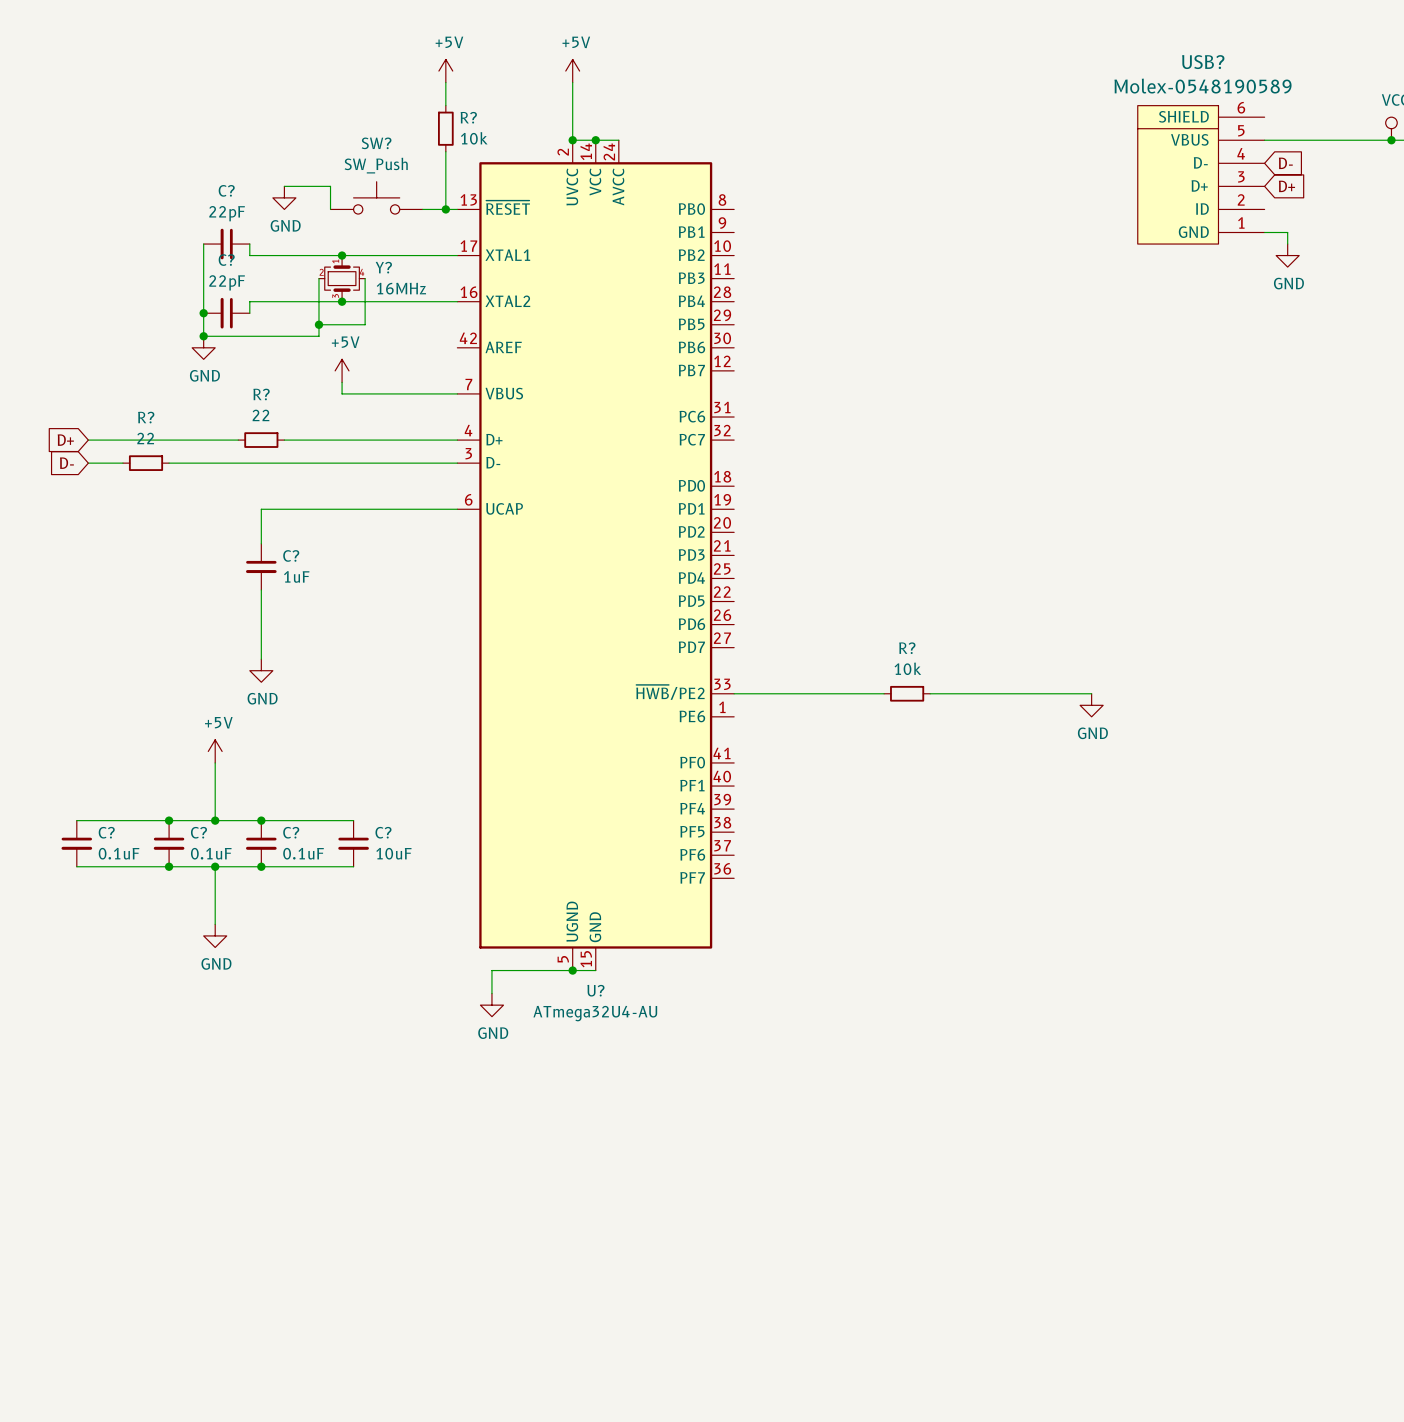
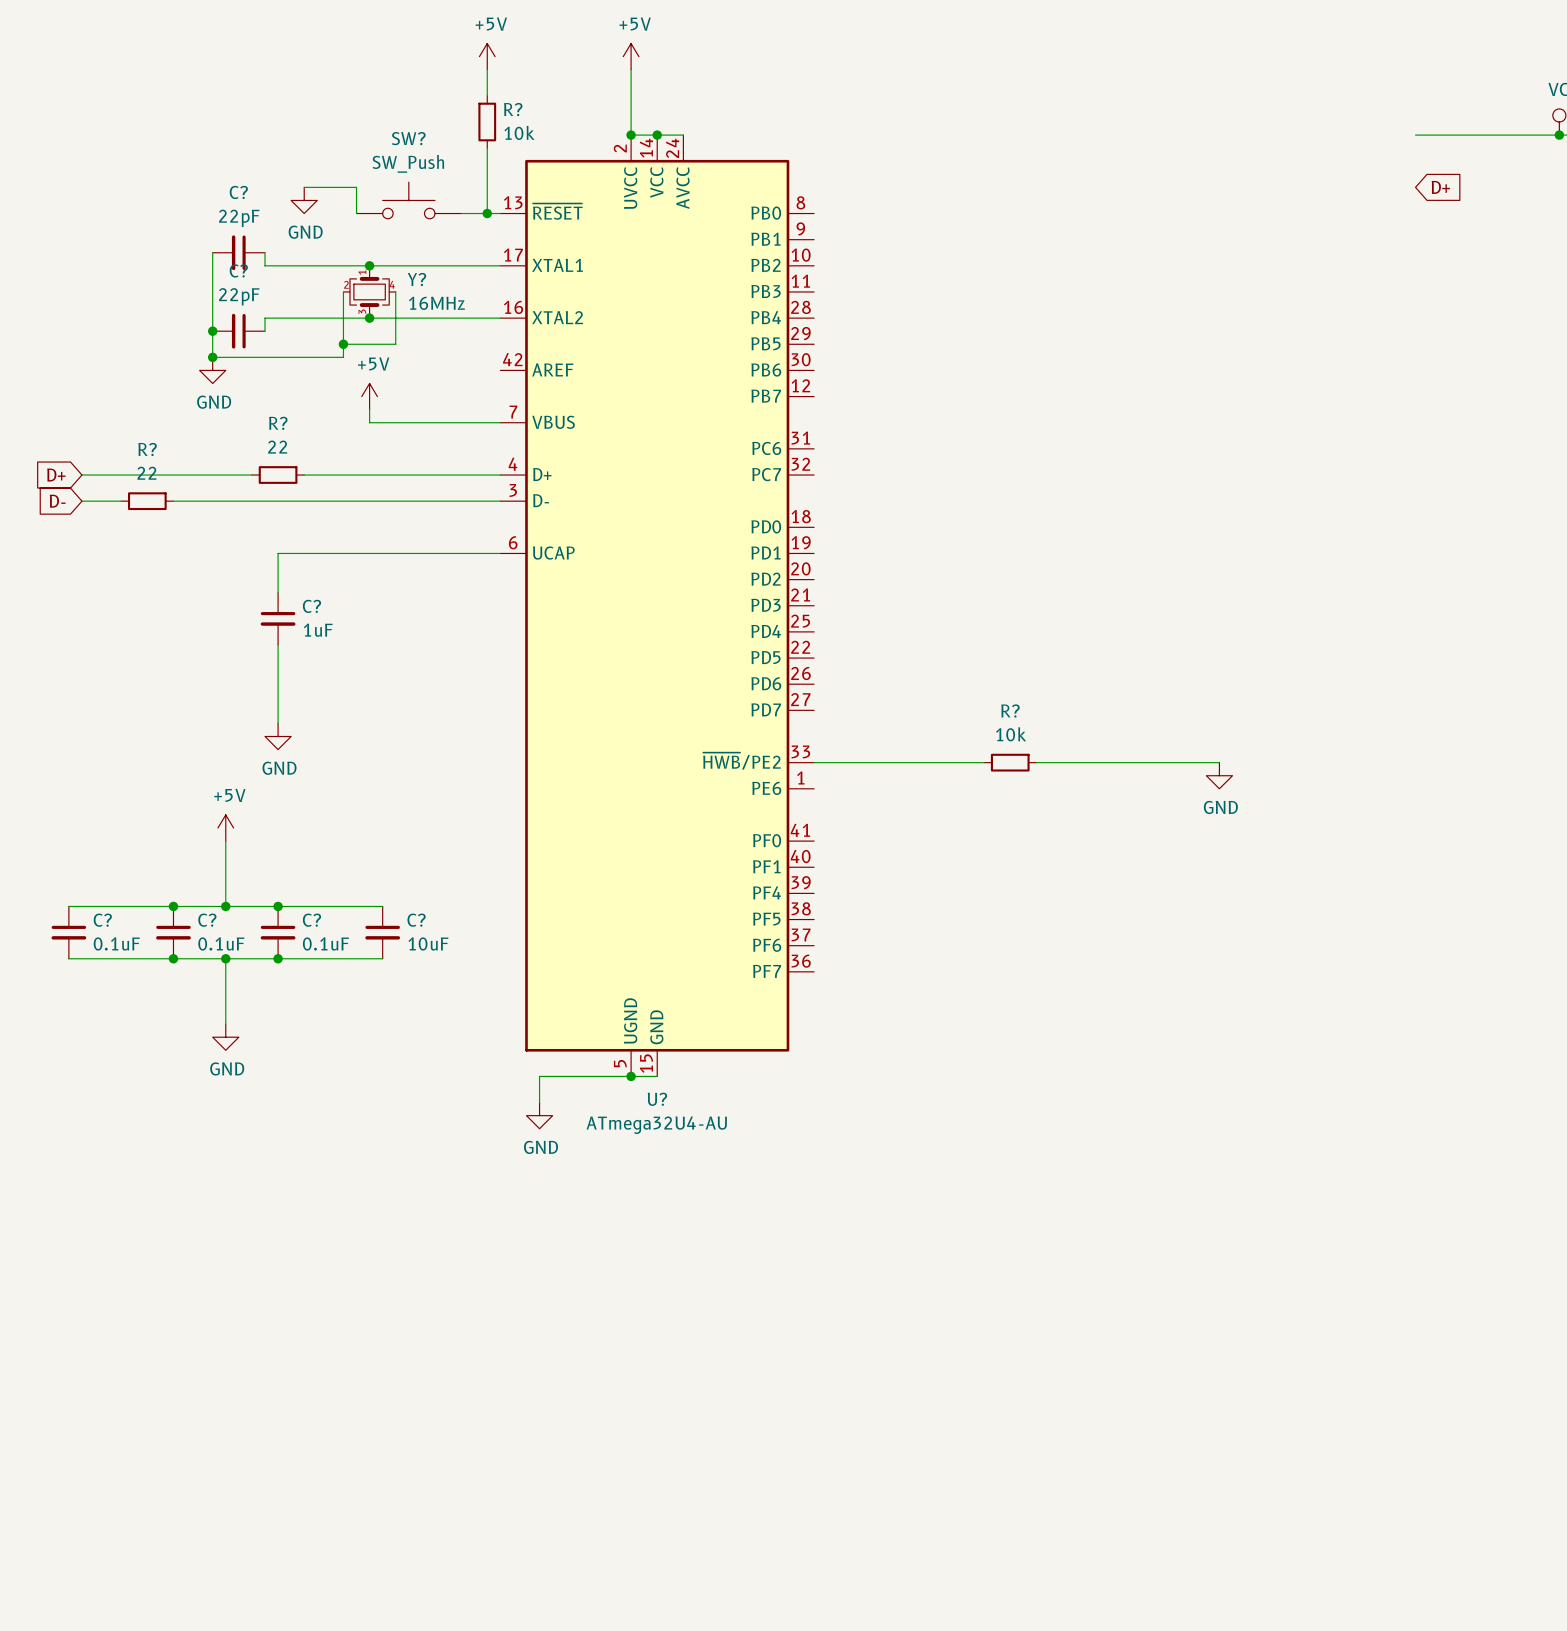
global label: D- (1285, 163) -> none
USB?: Molex-0548190589 (1201, 174) -> none
wire: (1264, 232) (1287, 232) (1287, 244) -> none
power symbol: GND (1287, 255) -> none

